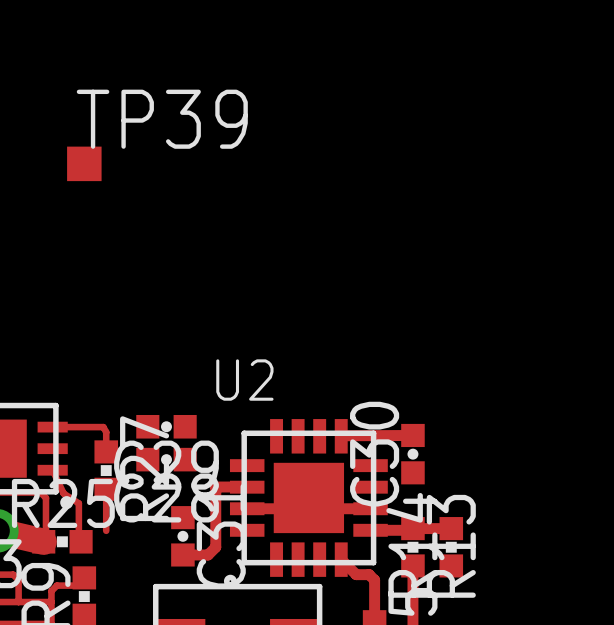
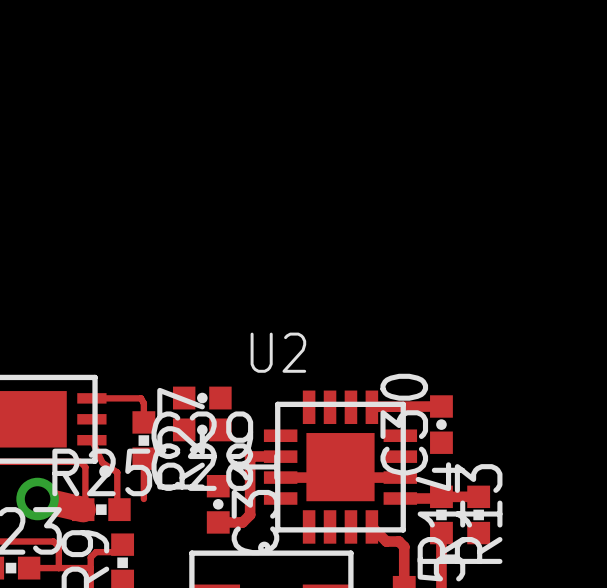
TP39: (84, 163) -> none

